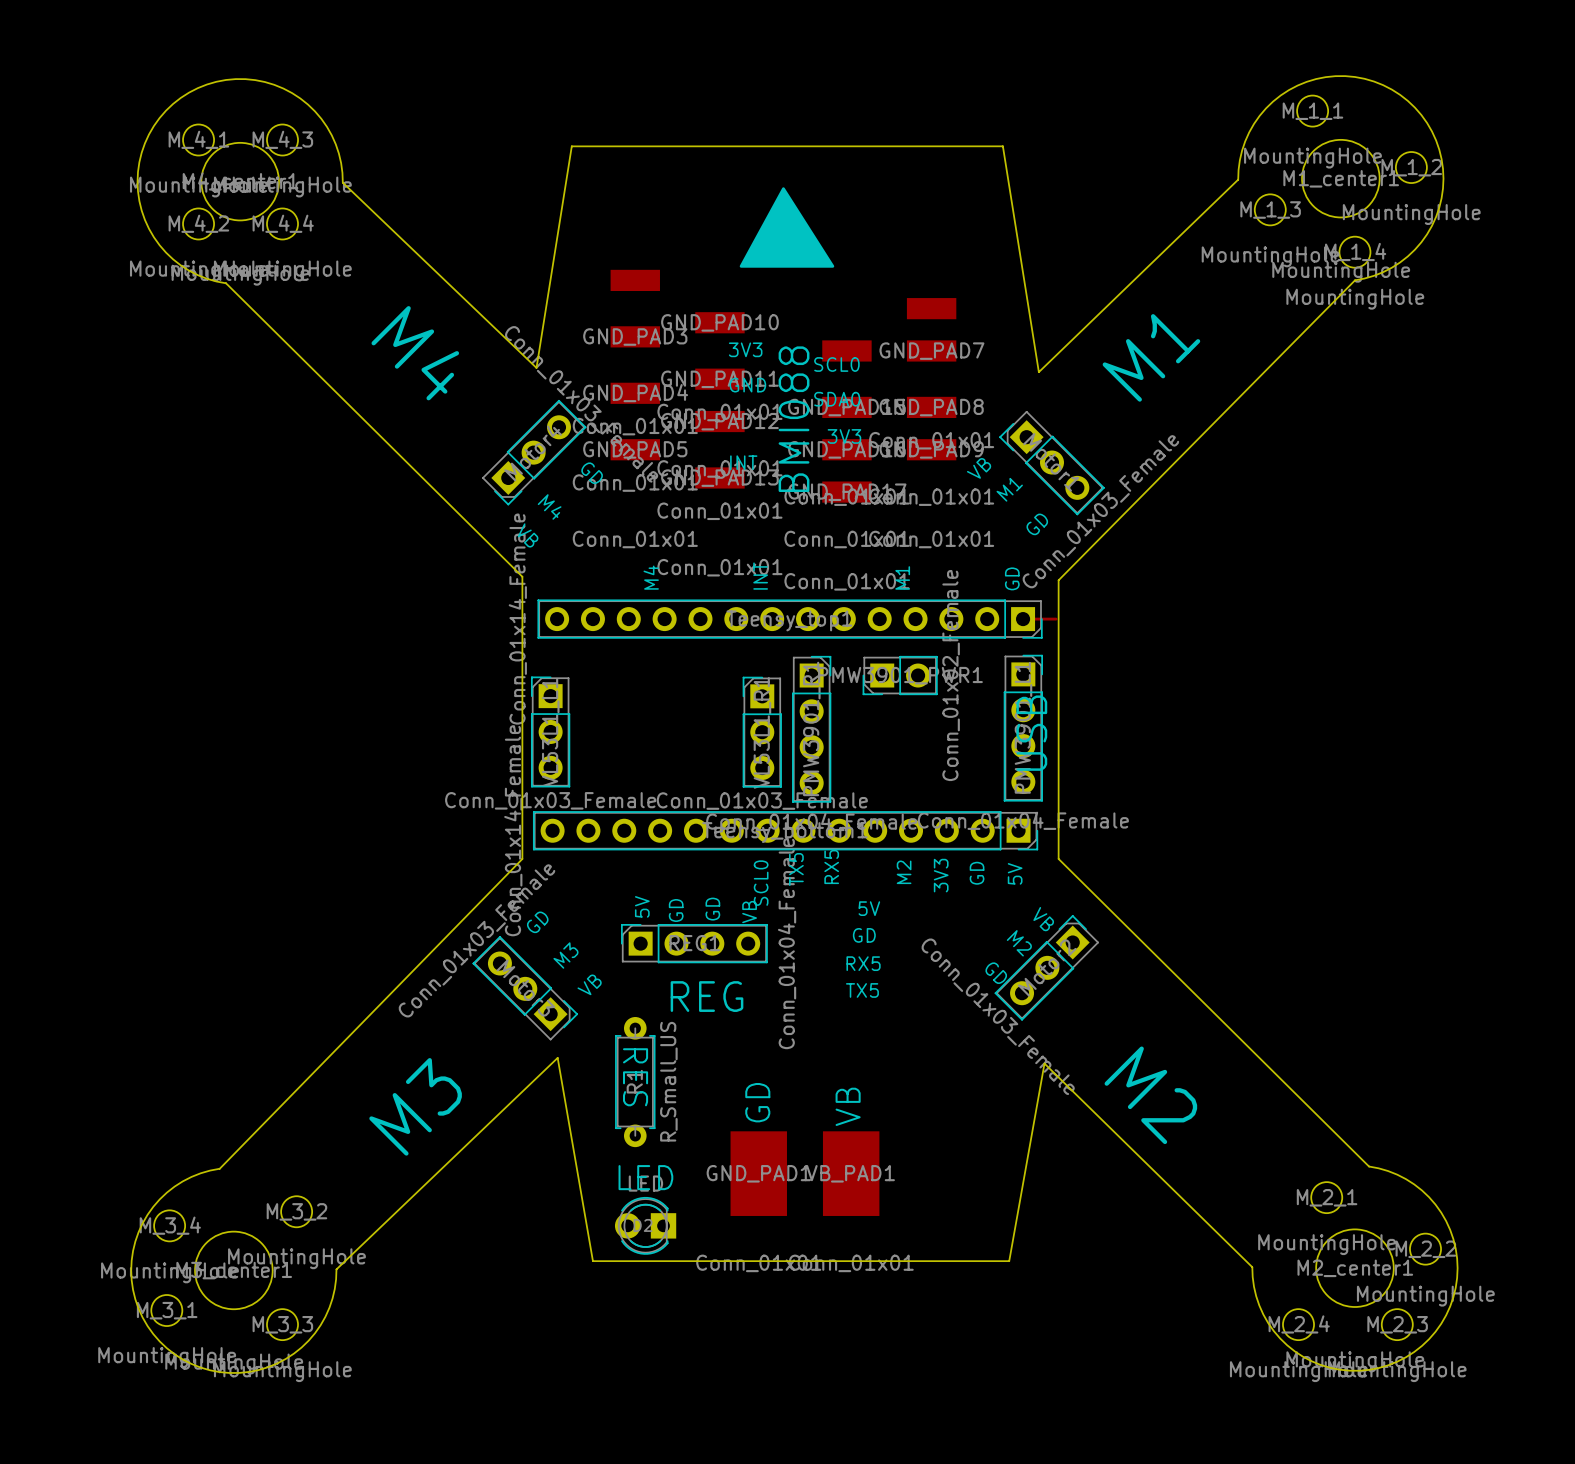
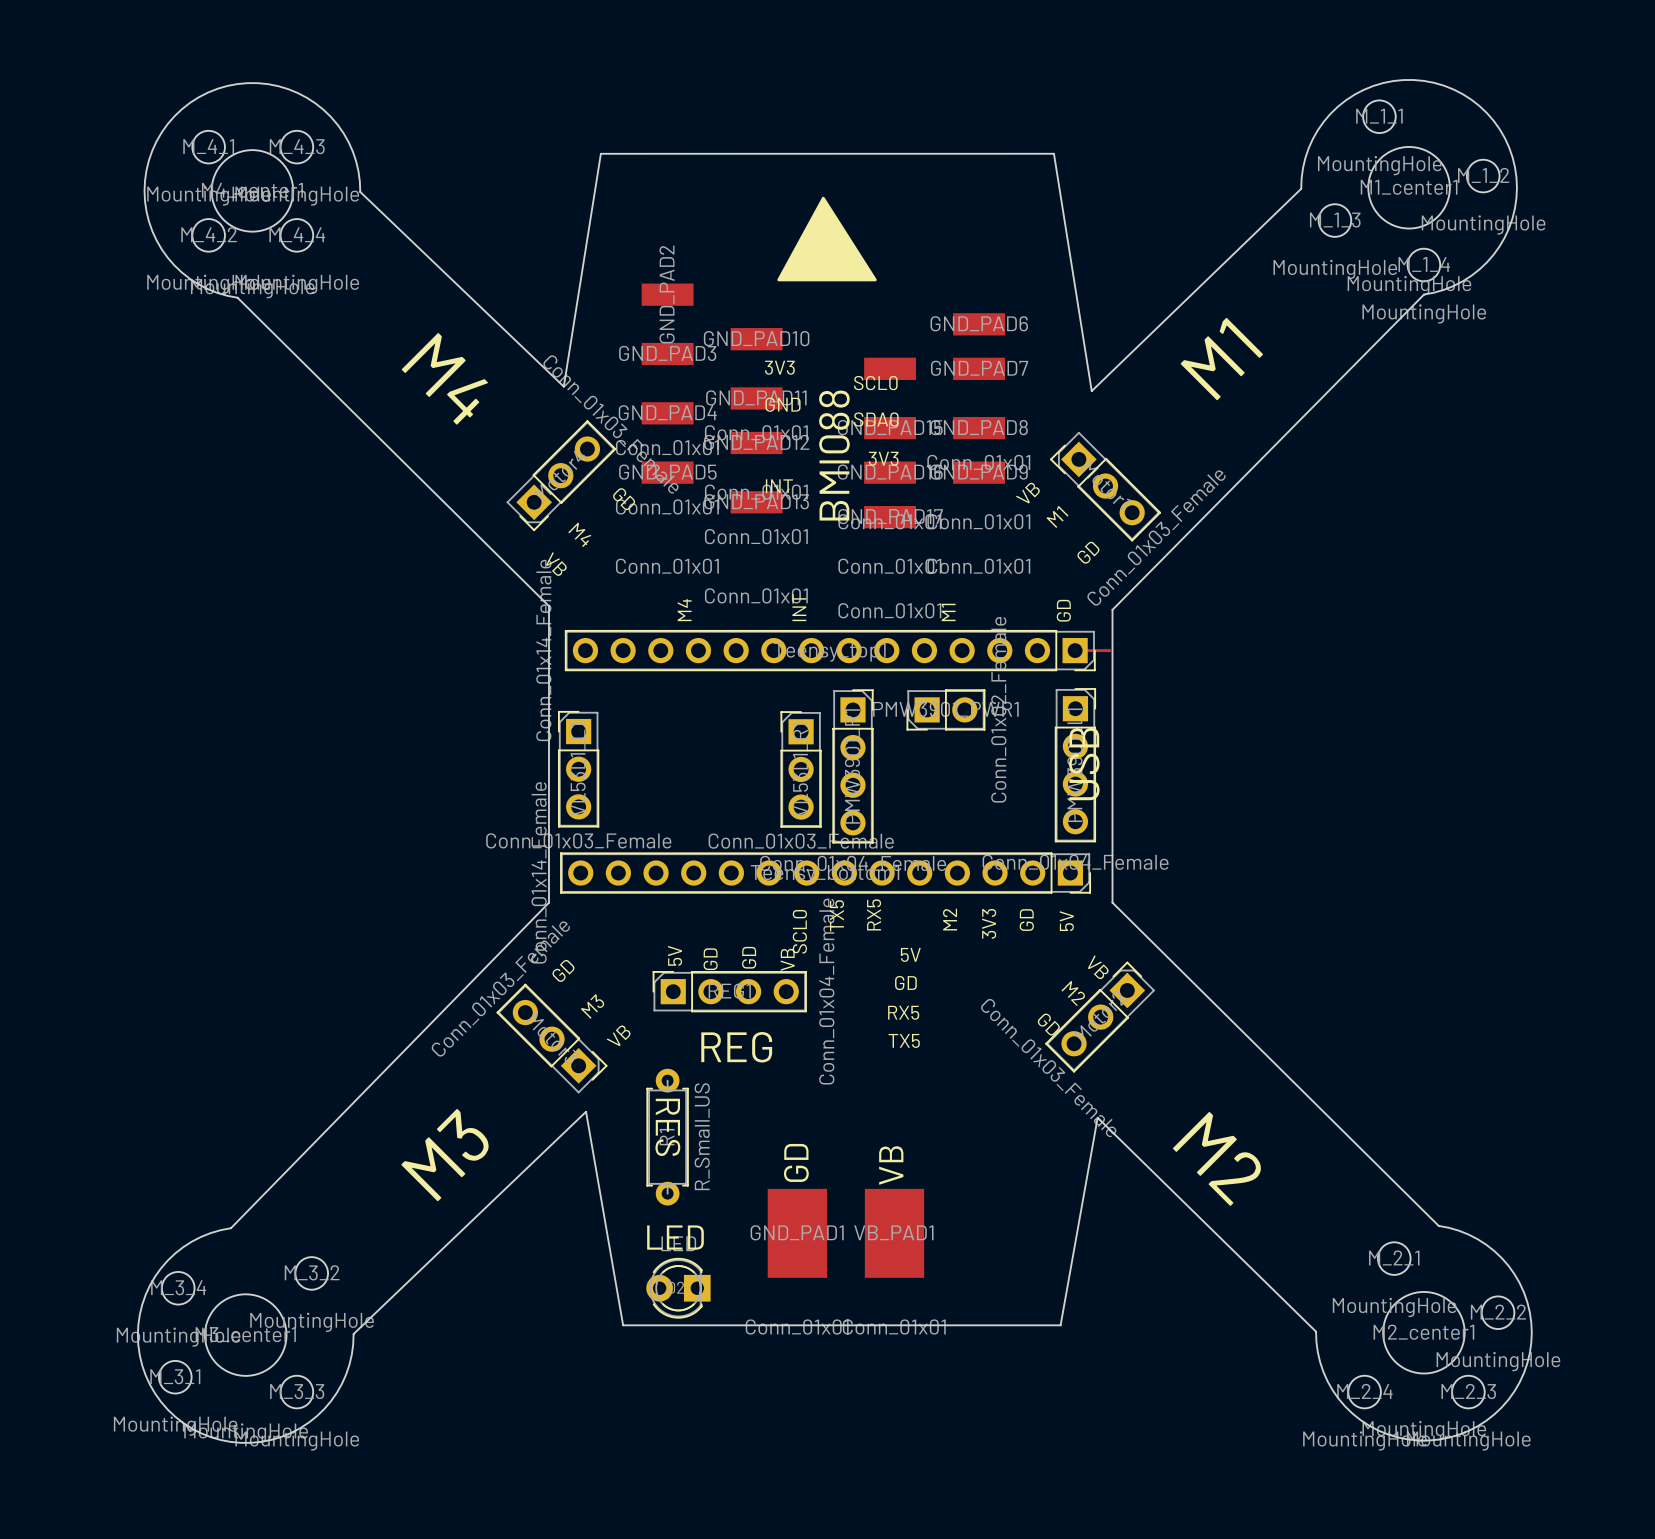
GND_PAD2 name: none -> GND_PAD2 (667, 294)
GND_PAD6 name: none -> GND_PAD6 (979, 323)

